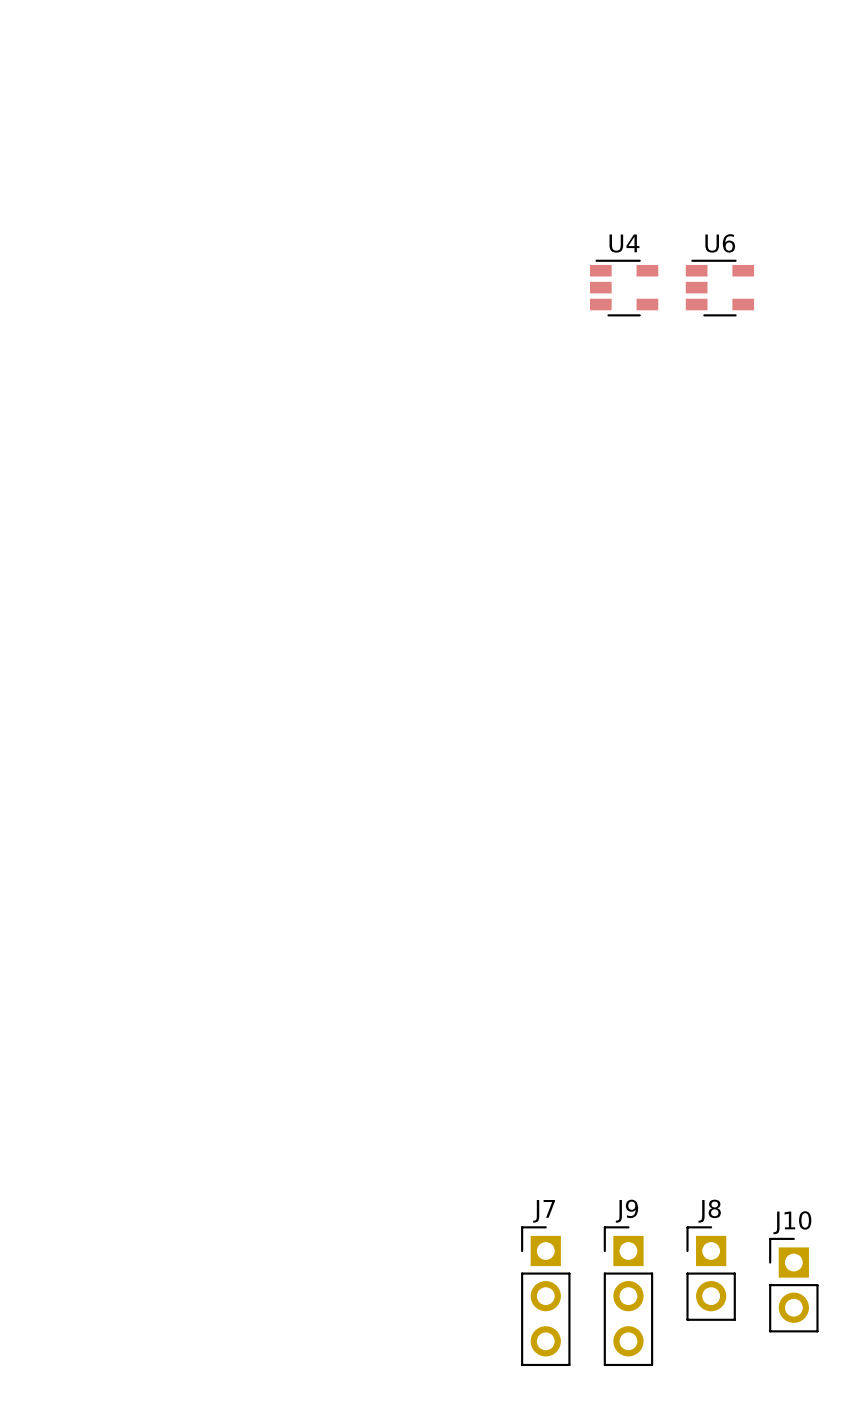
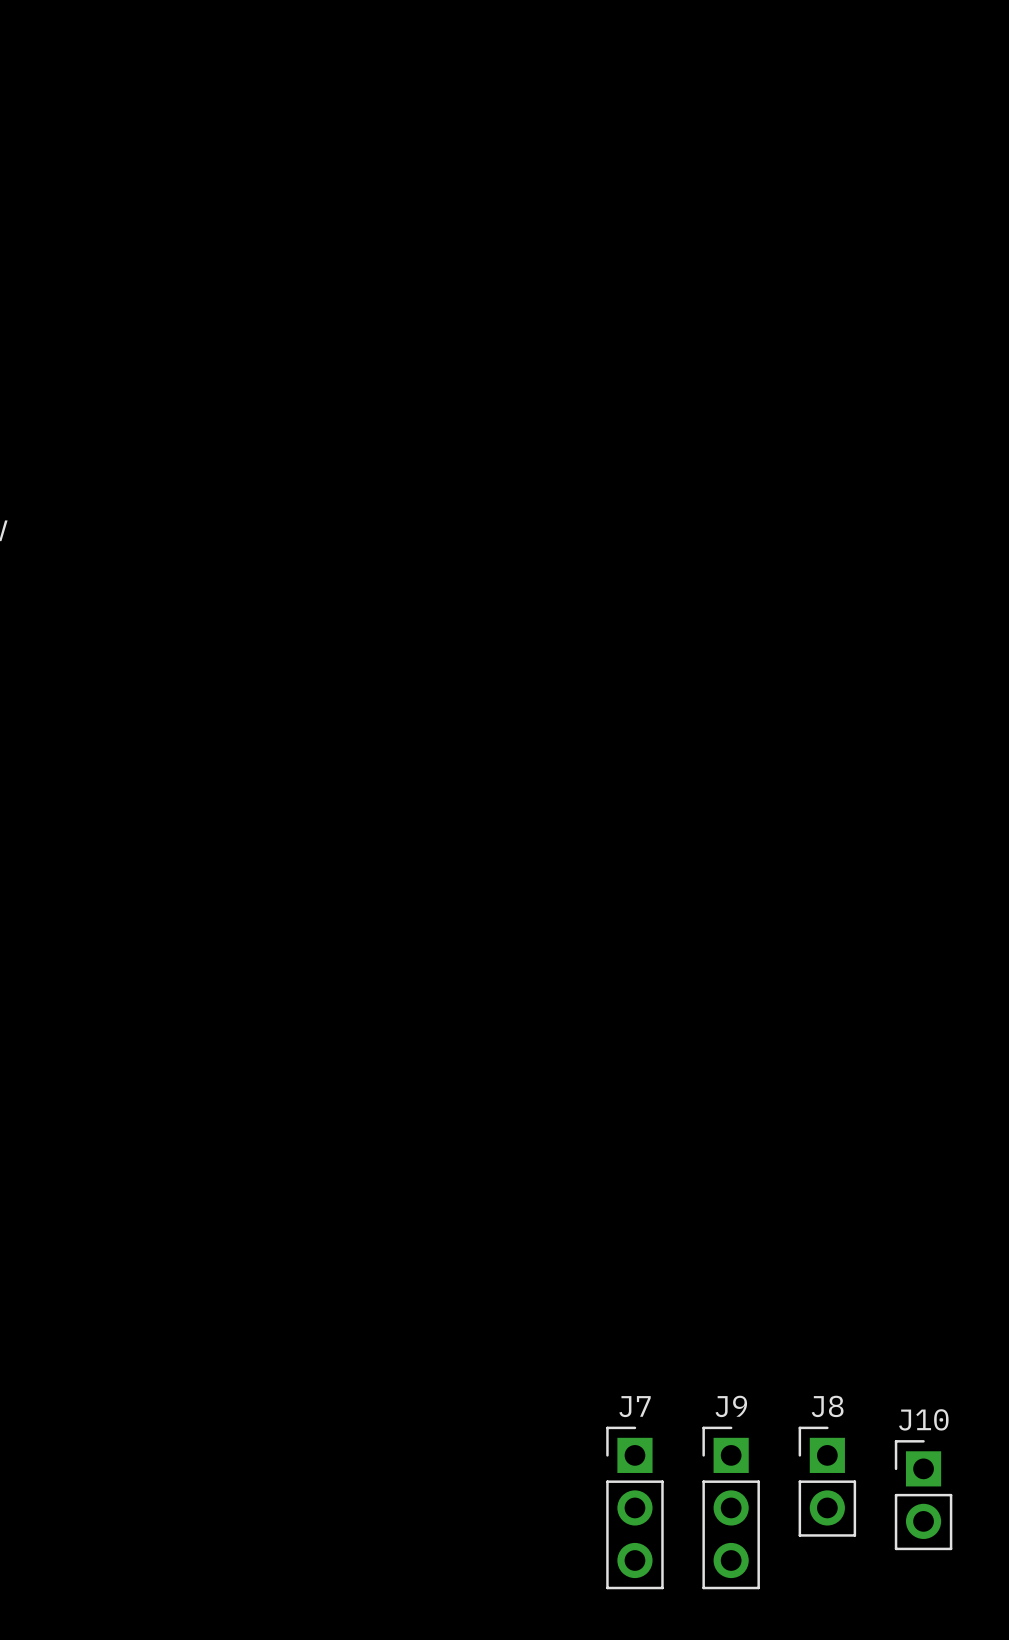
U4: (624, 288) -> none
U6: (719, 288) -> none

